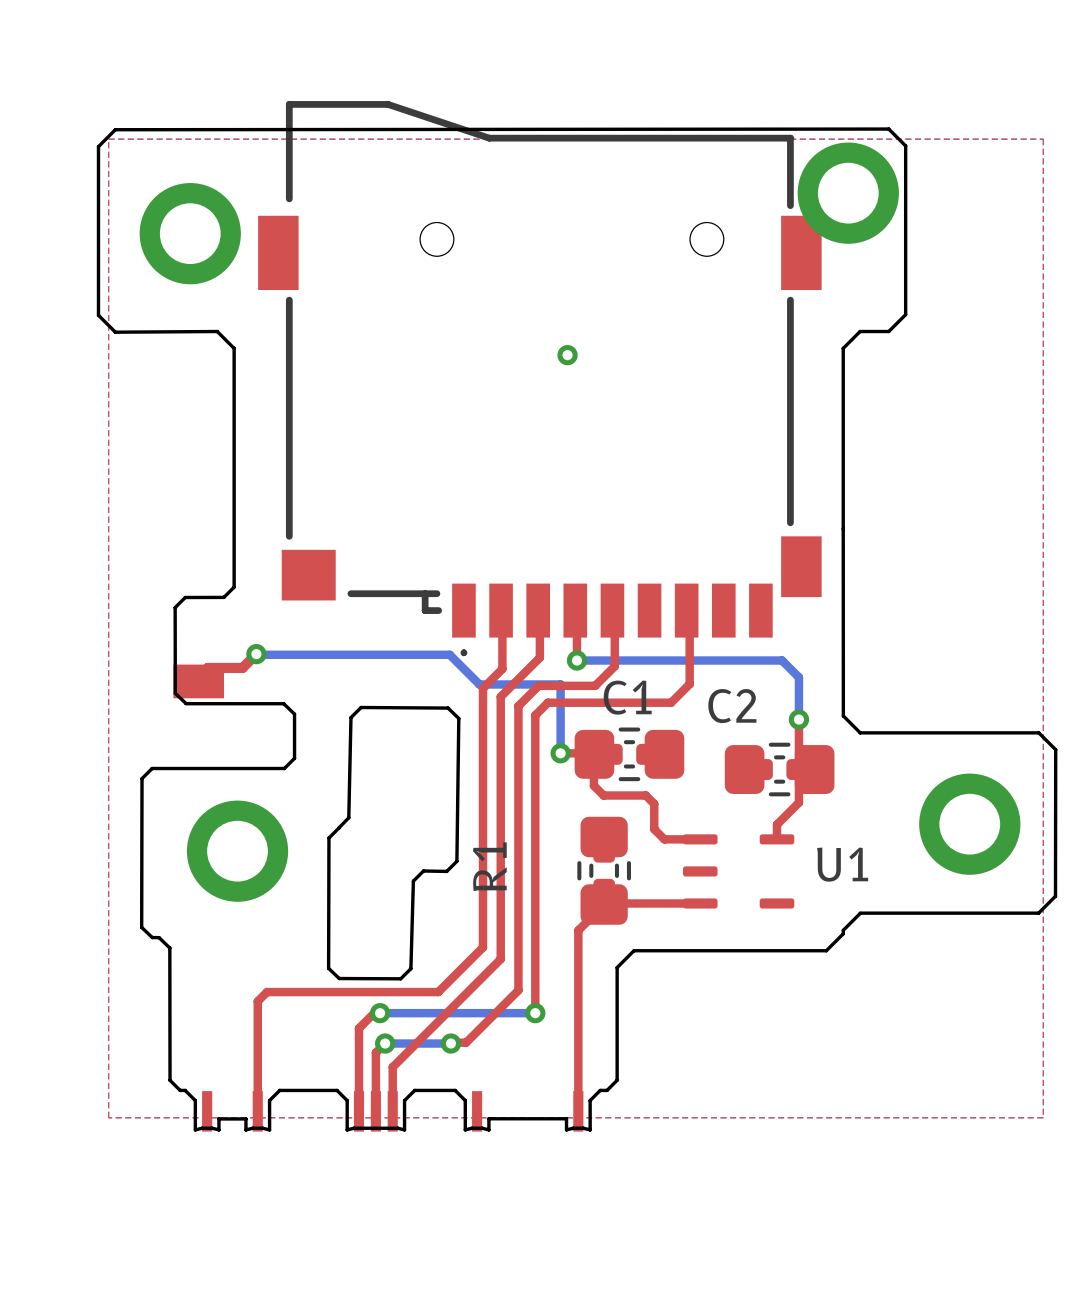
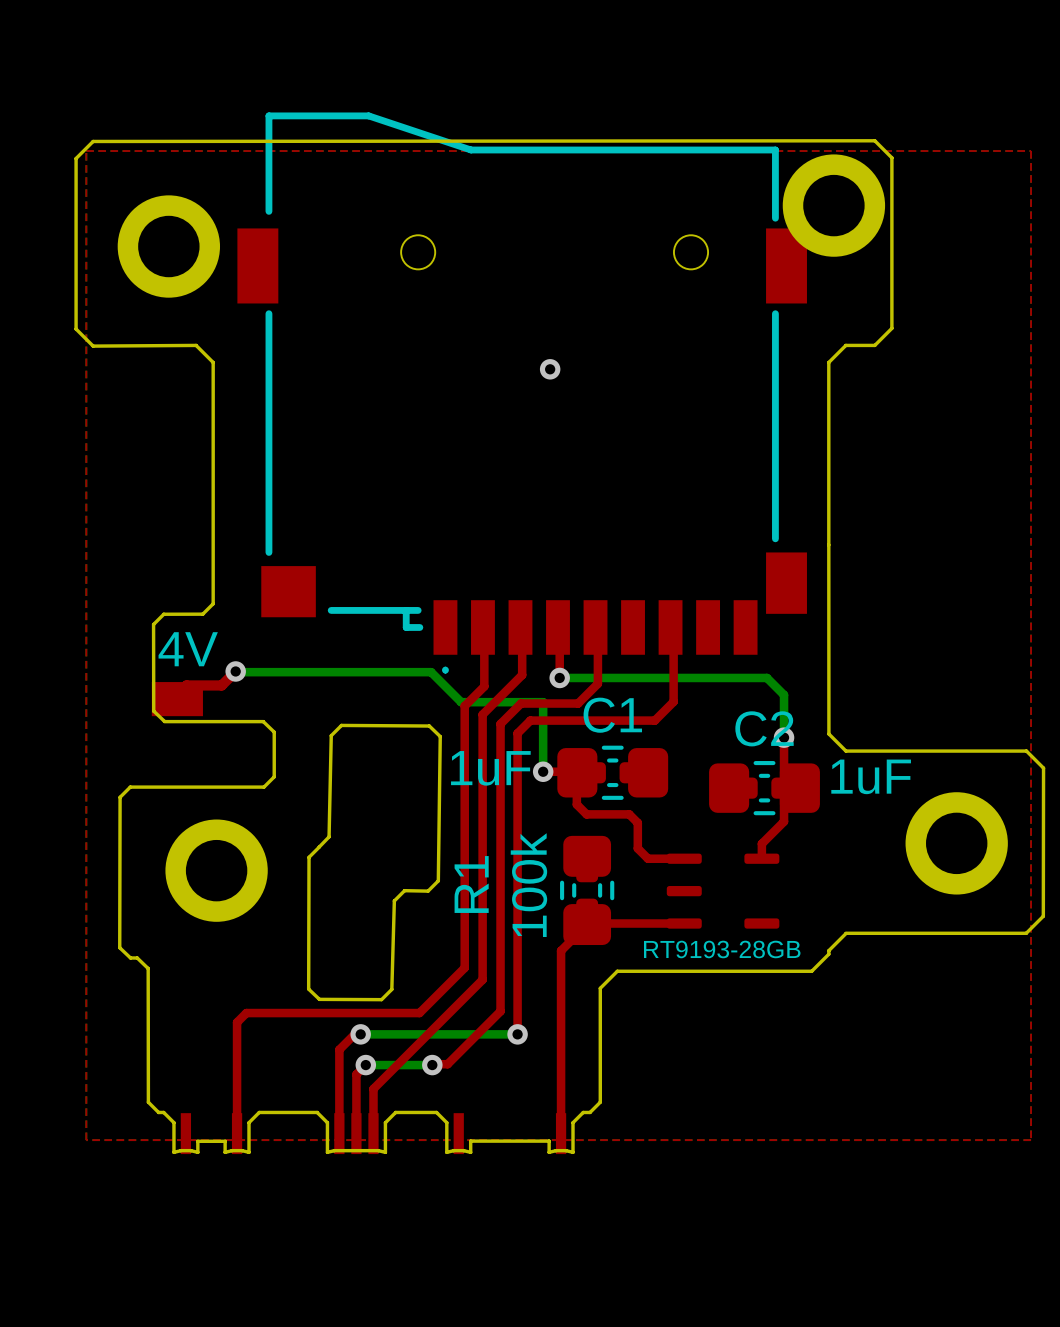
text: none -> 4V (188, 649)
C2 name position: C2 (732, 706) -> C2 (764, 728)
C1 value: none -> 1uF (490, 768)
C2 value: none -> 1uF (871, 776)
U1 name: U1 (842, 864) -> RT9193-28GB (722, 949)
R1 value: none -> 100k (528, 885)

